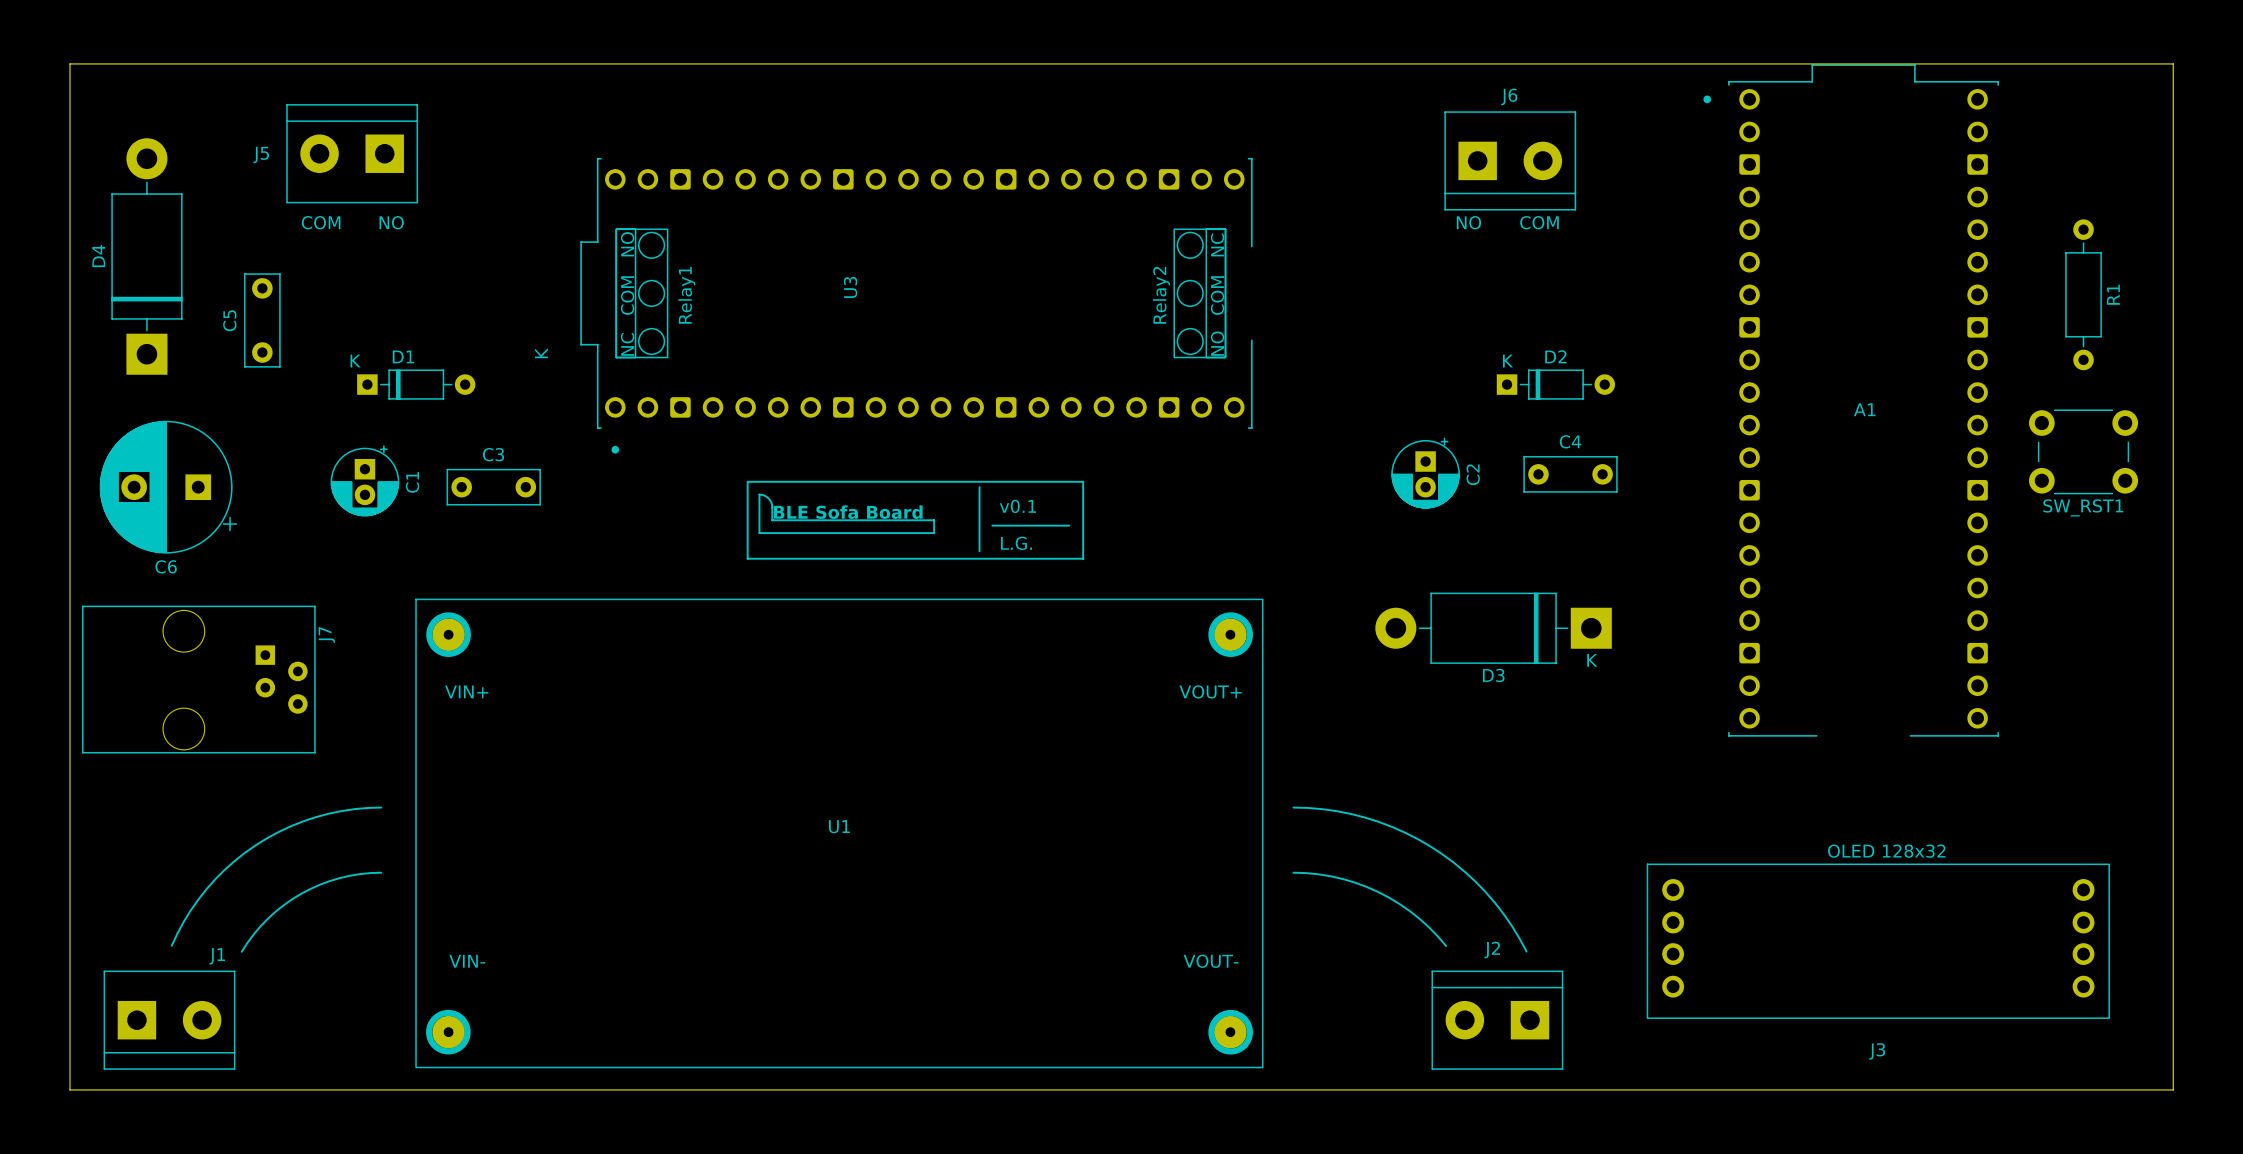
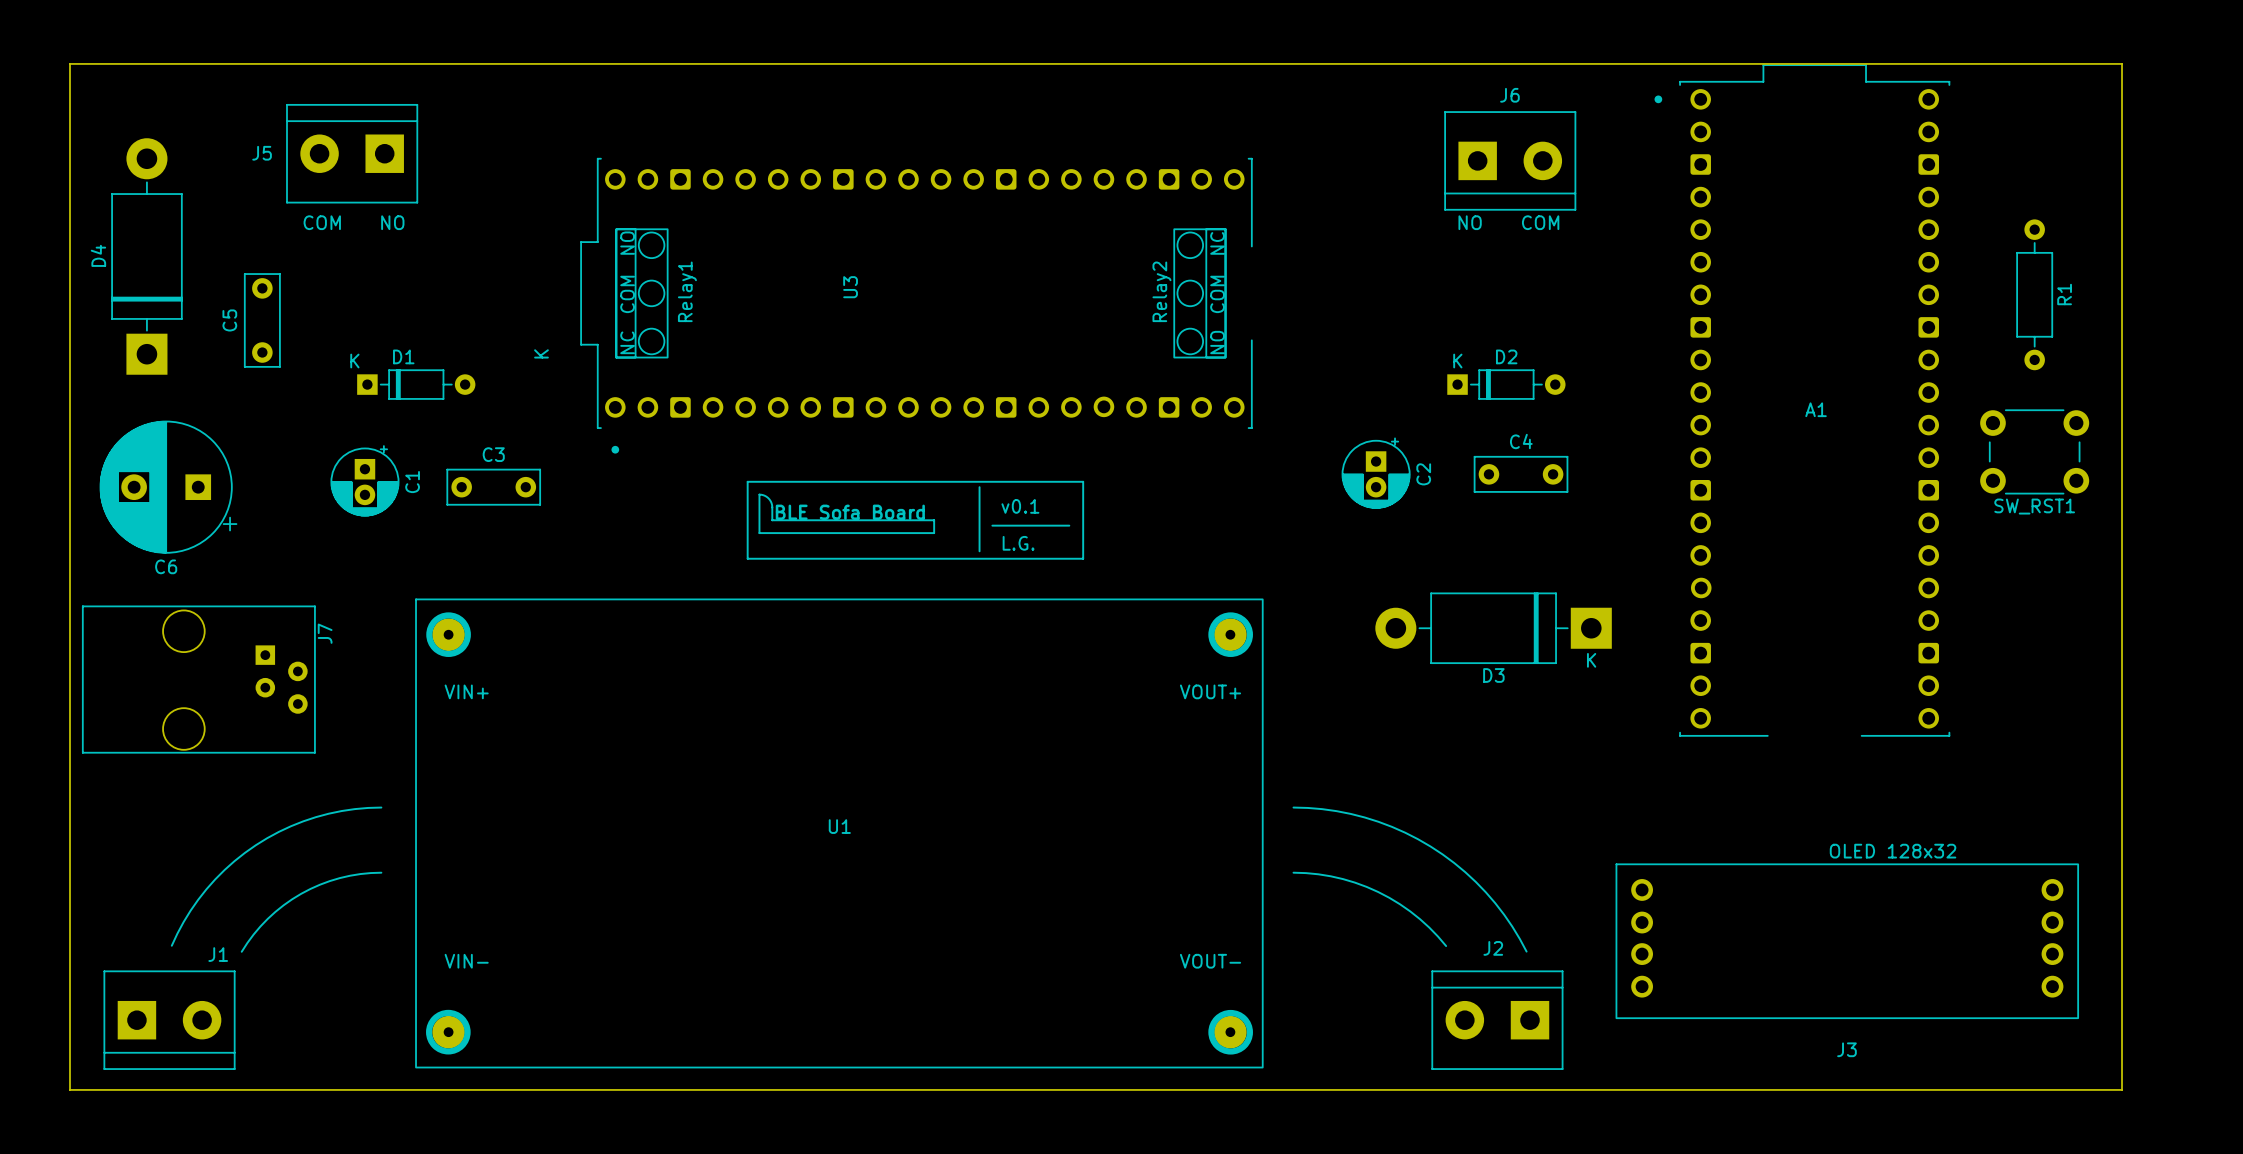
board edge: (2122, 63) (2173, 63) (2173, 1089) (2122, 1089) -> (2122, 63) (2122, 1089)
R1 position: (2083, 294) -> (2034, 294)
D2 position: (1555, 384) -> (1506, 384)
A1 position: (1851, 400) -> (1802, 400)
SW_RST1 position: (2083, 451) -> (2034, 451)
C2 position: (1425, 473) -> (1376, 473)
C4 position: (1570, 474) -> (1521, 474)
J3 position: (1878, 941) -> (1847, 941)

